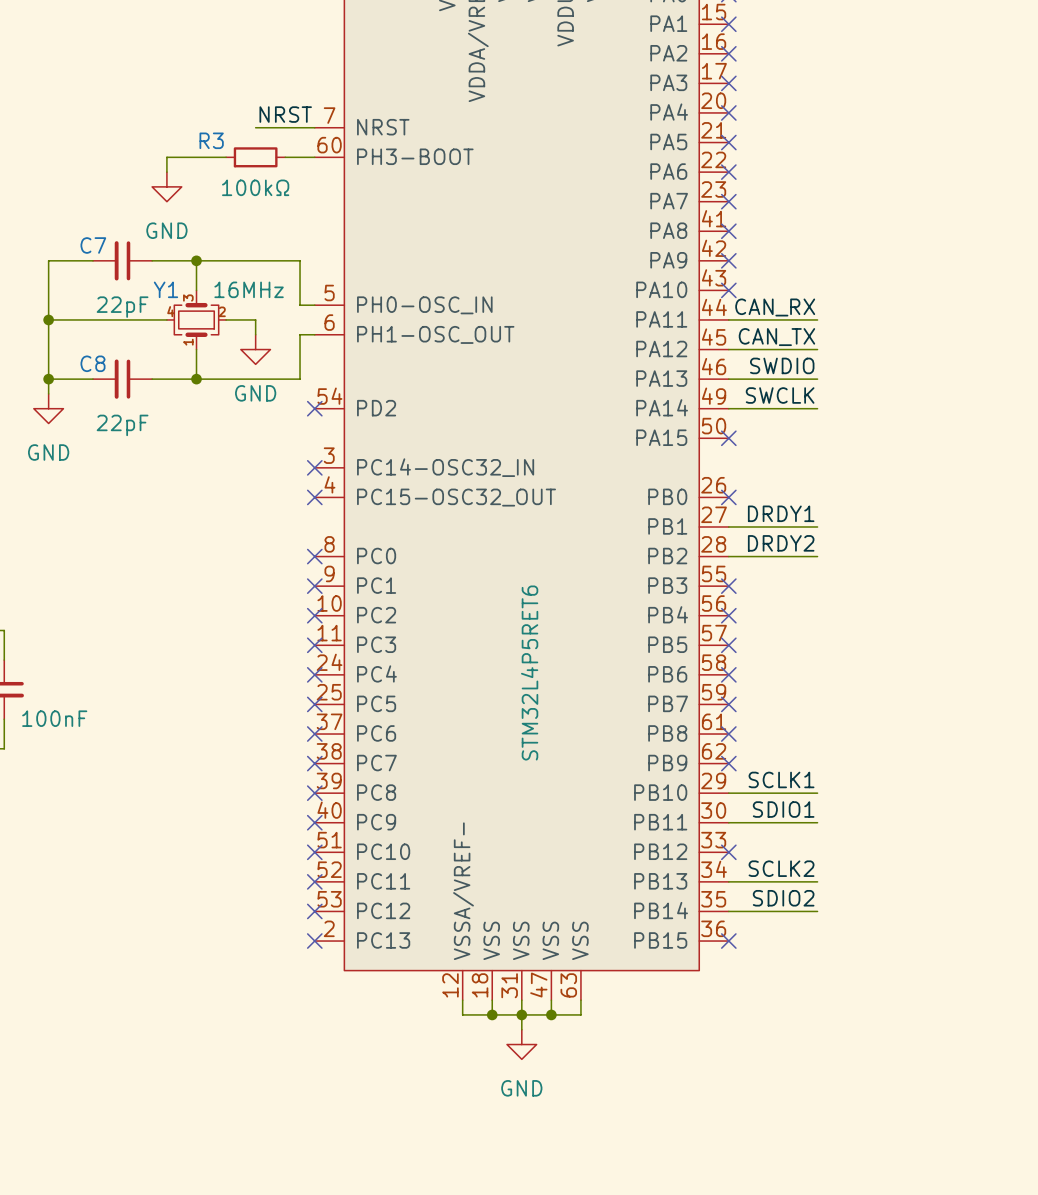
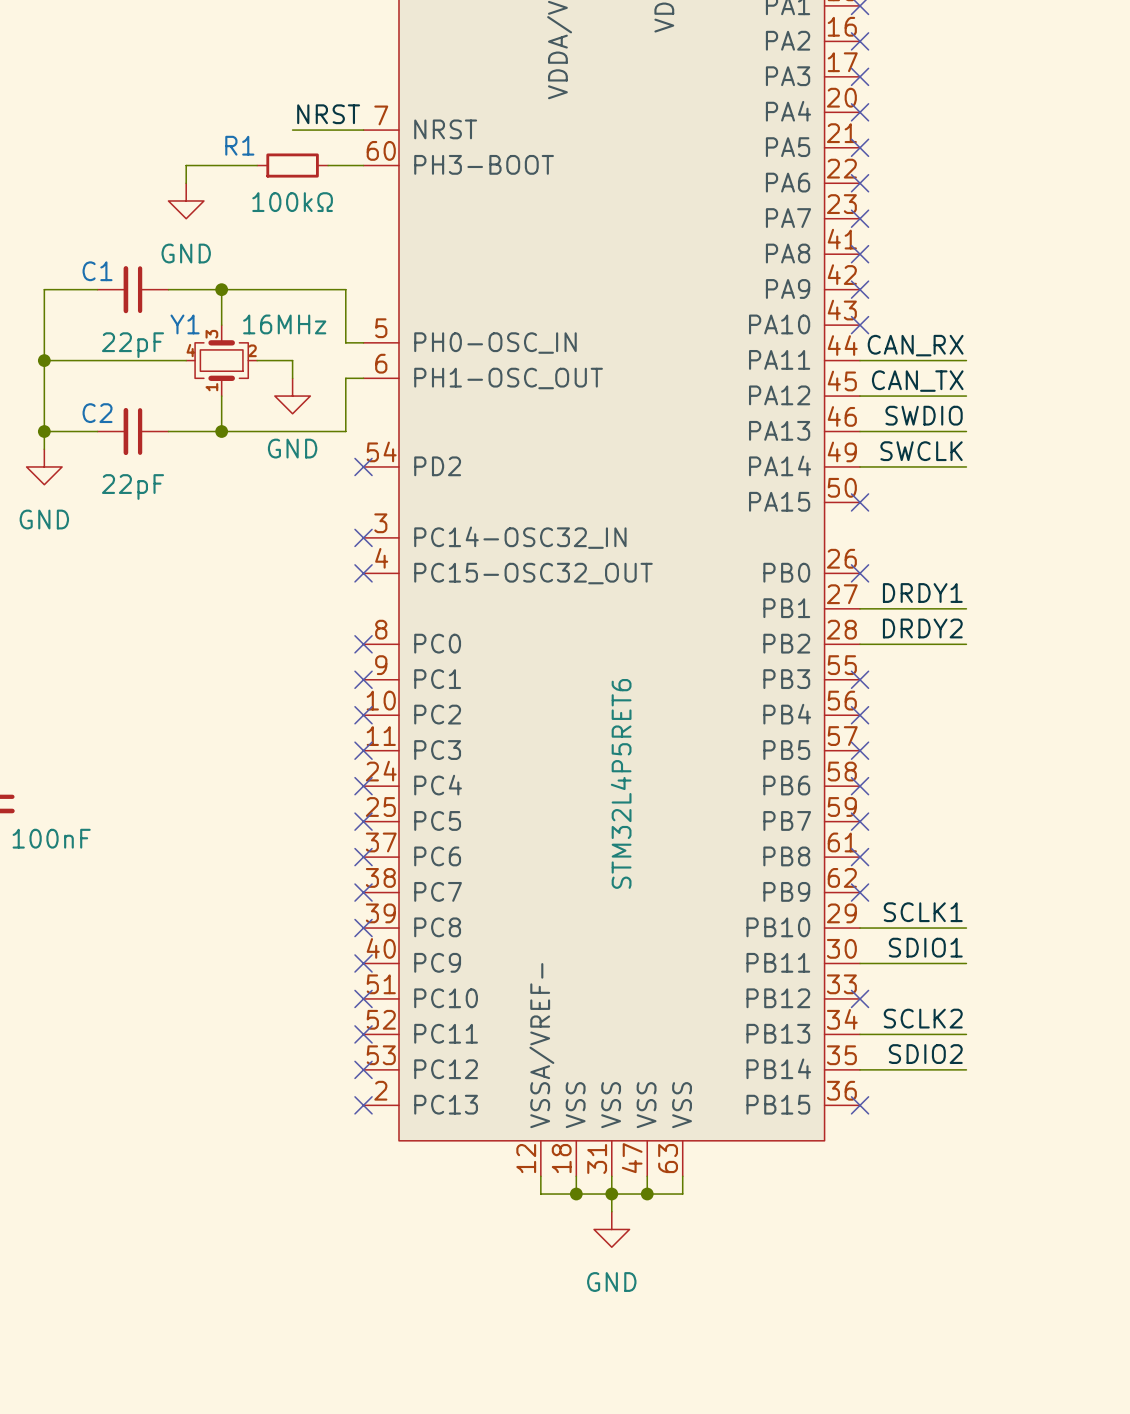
R3 name: R3 (211, 140) -> R1 (239, 145)
C7 name: C7 (93, 245) -> C1 (97, 271)
C8 name: C8 (92, 363) -> C2 (97, 413)

